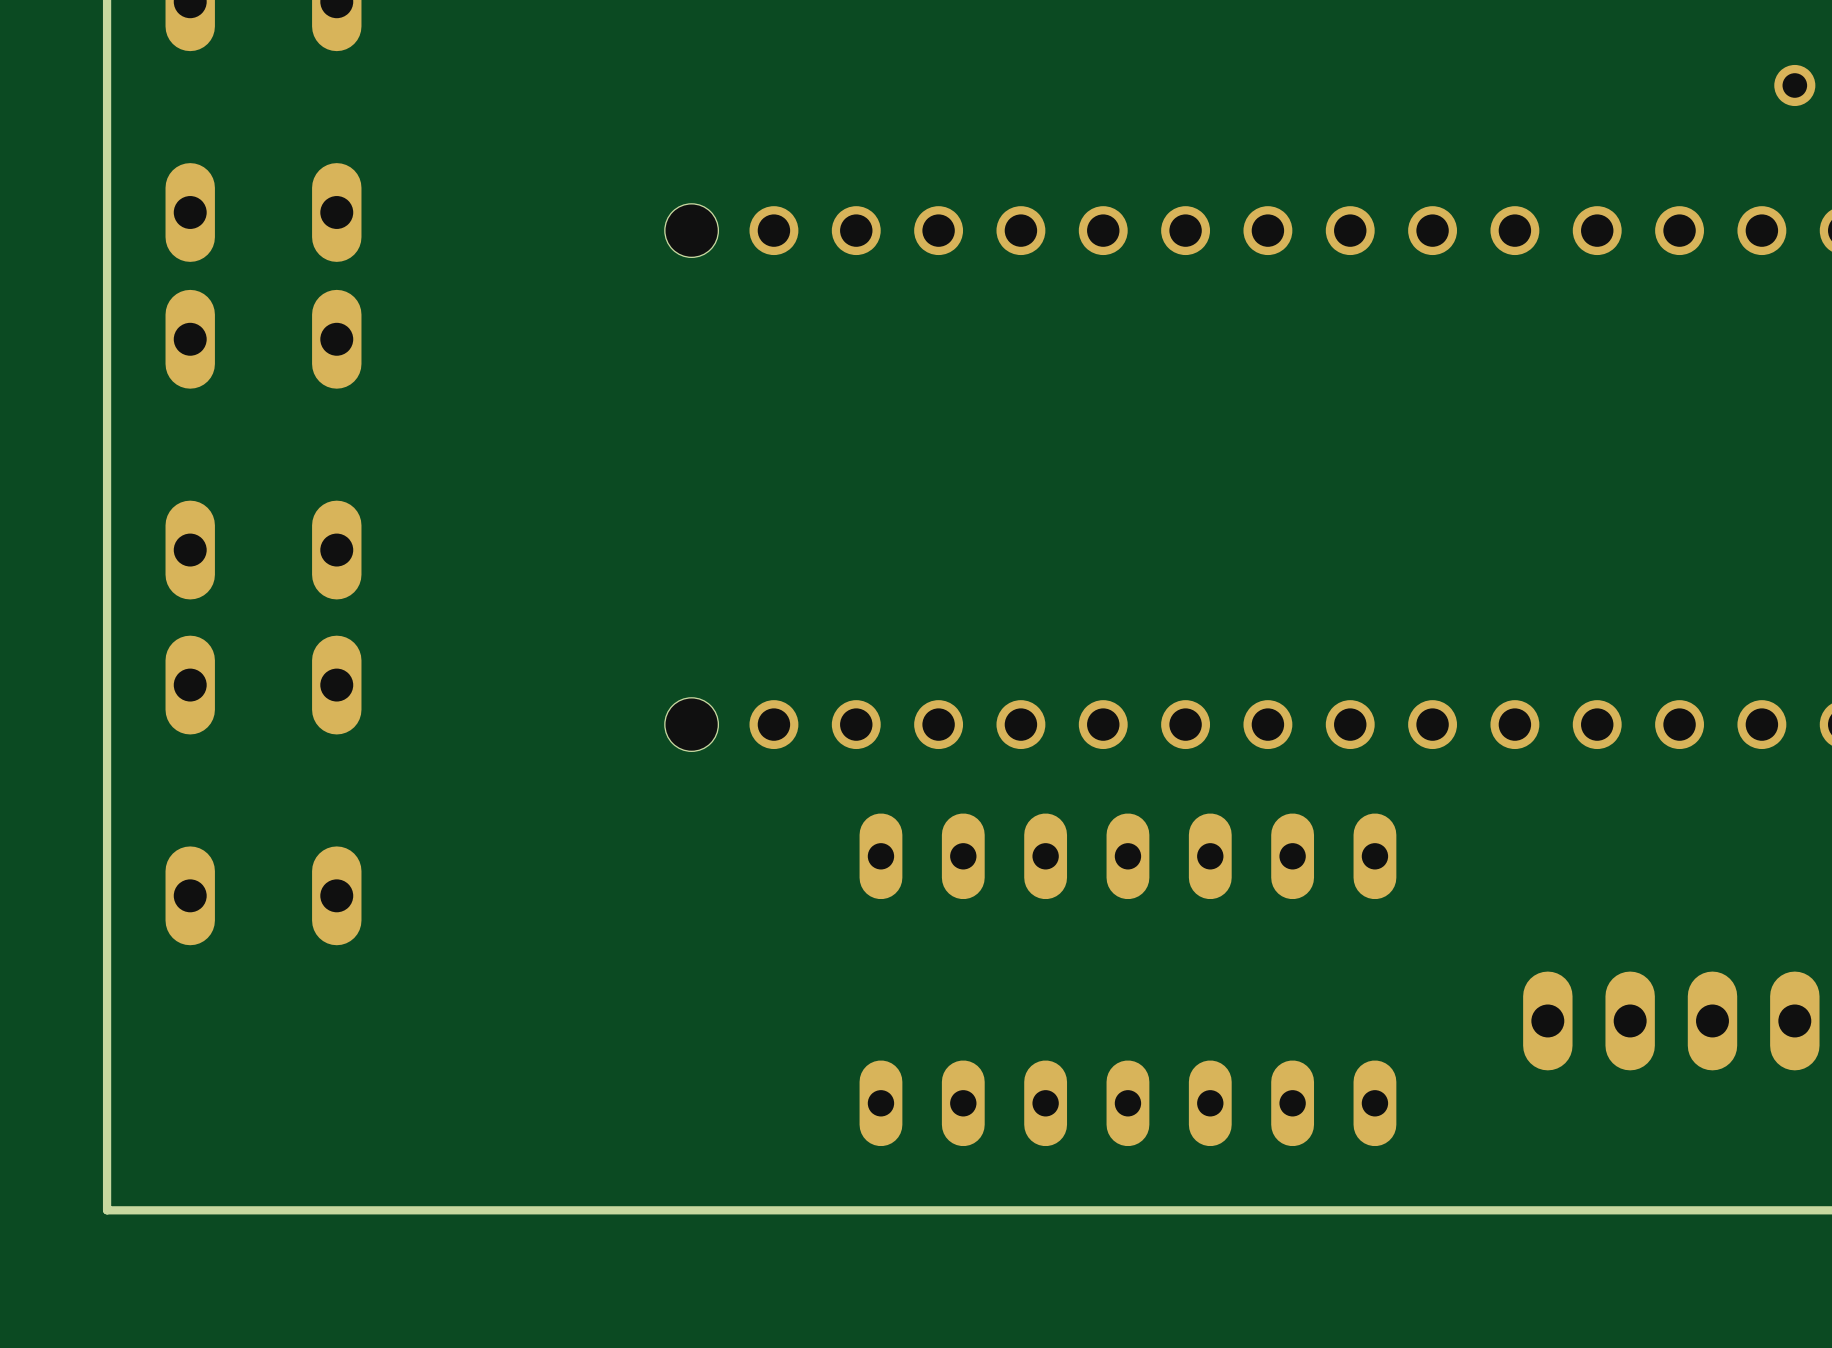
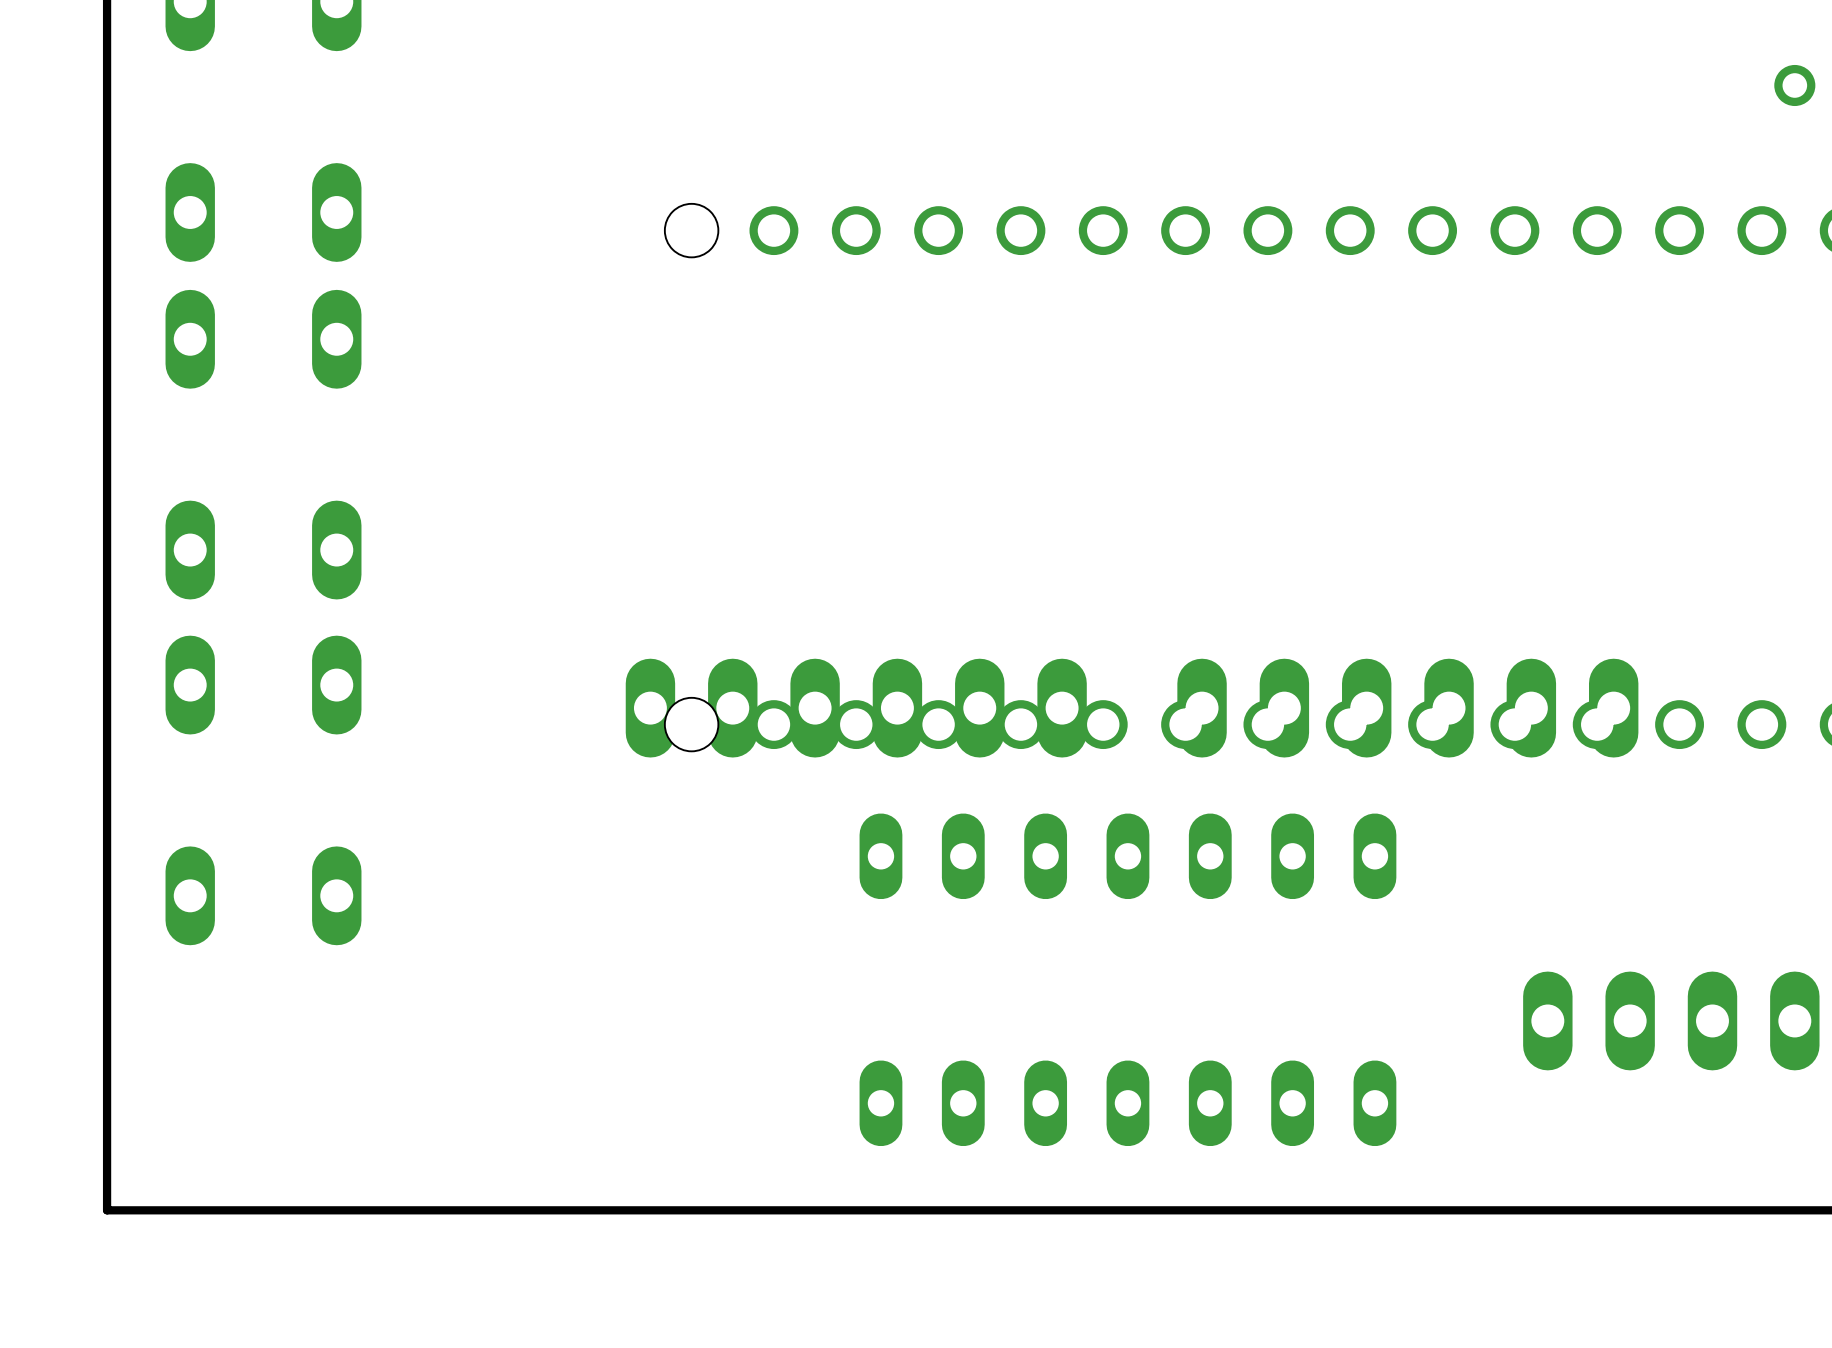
part: none -> (856, 708)
part: none -> (1407, 708)

